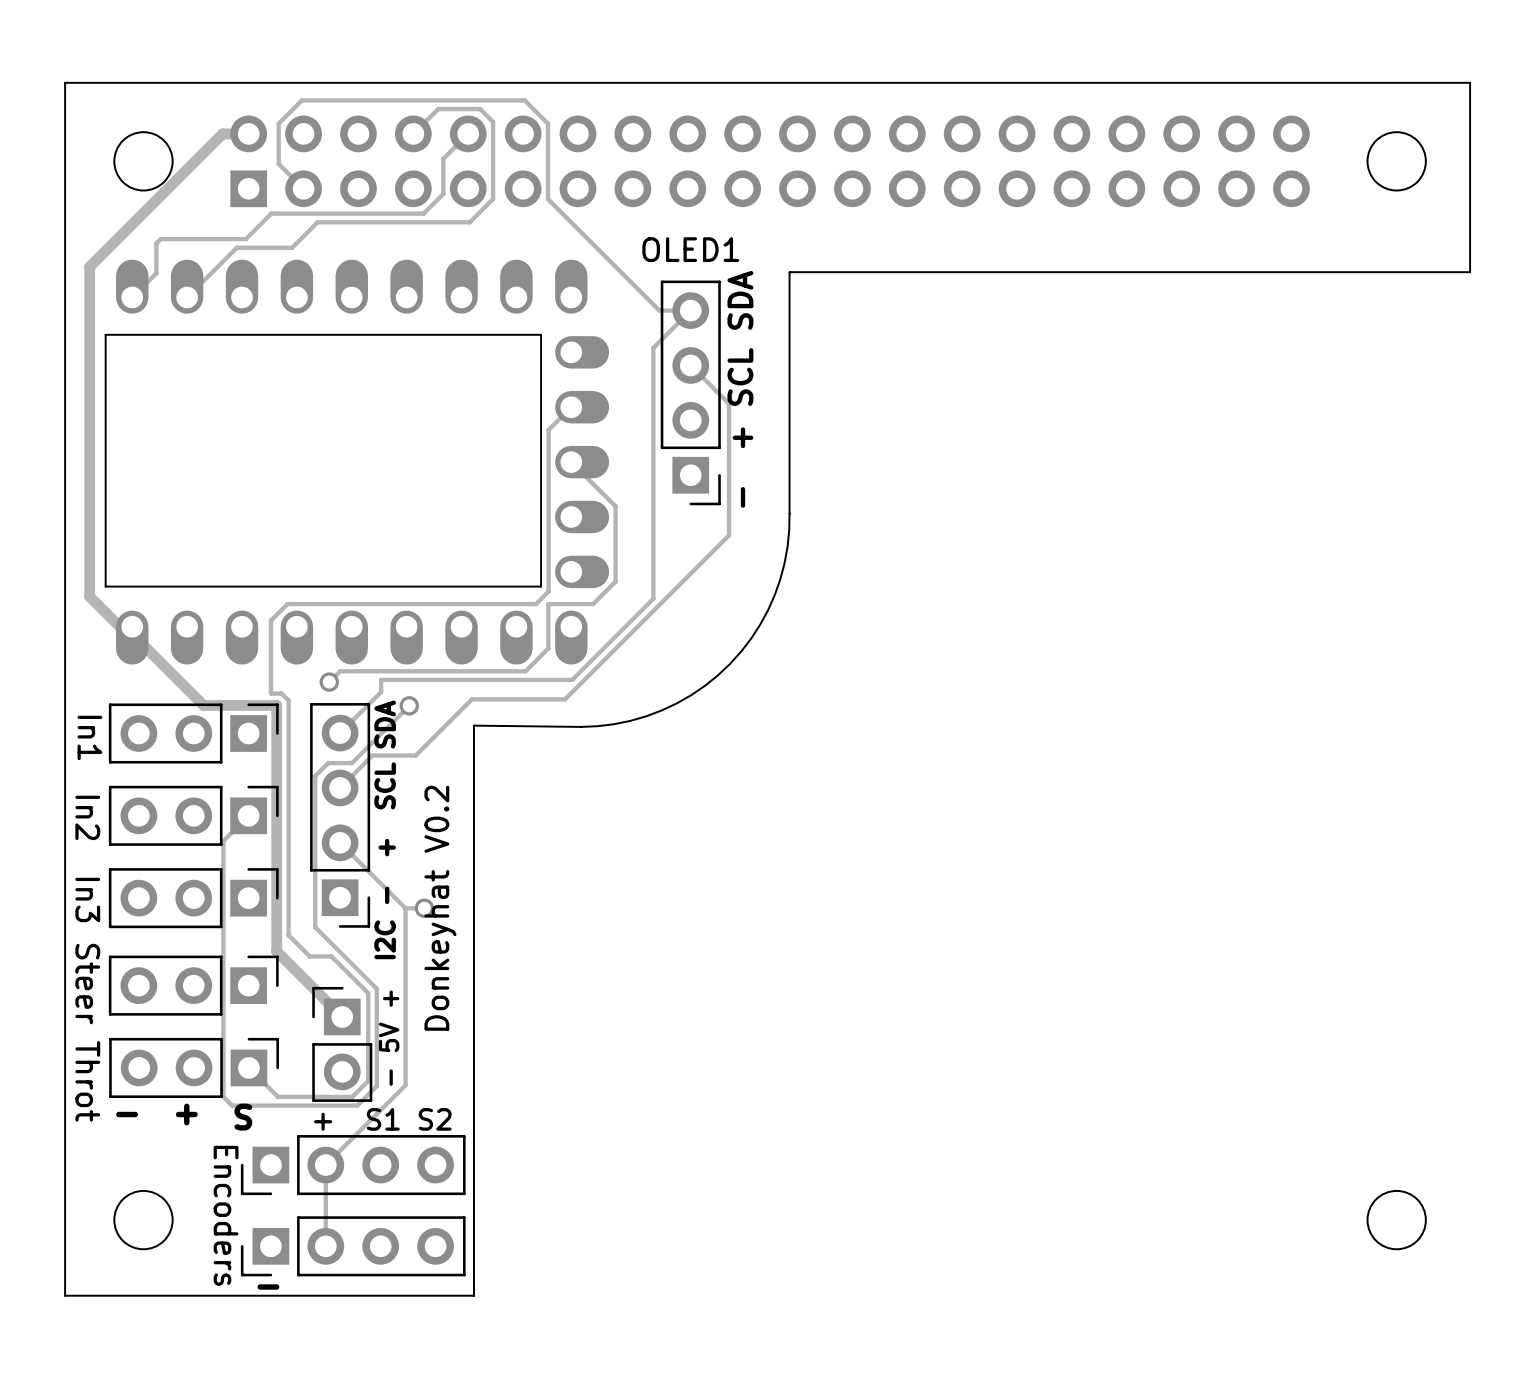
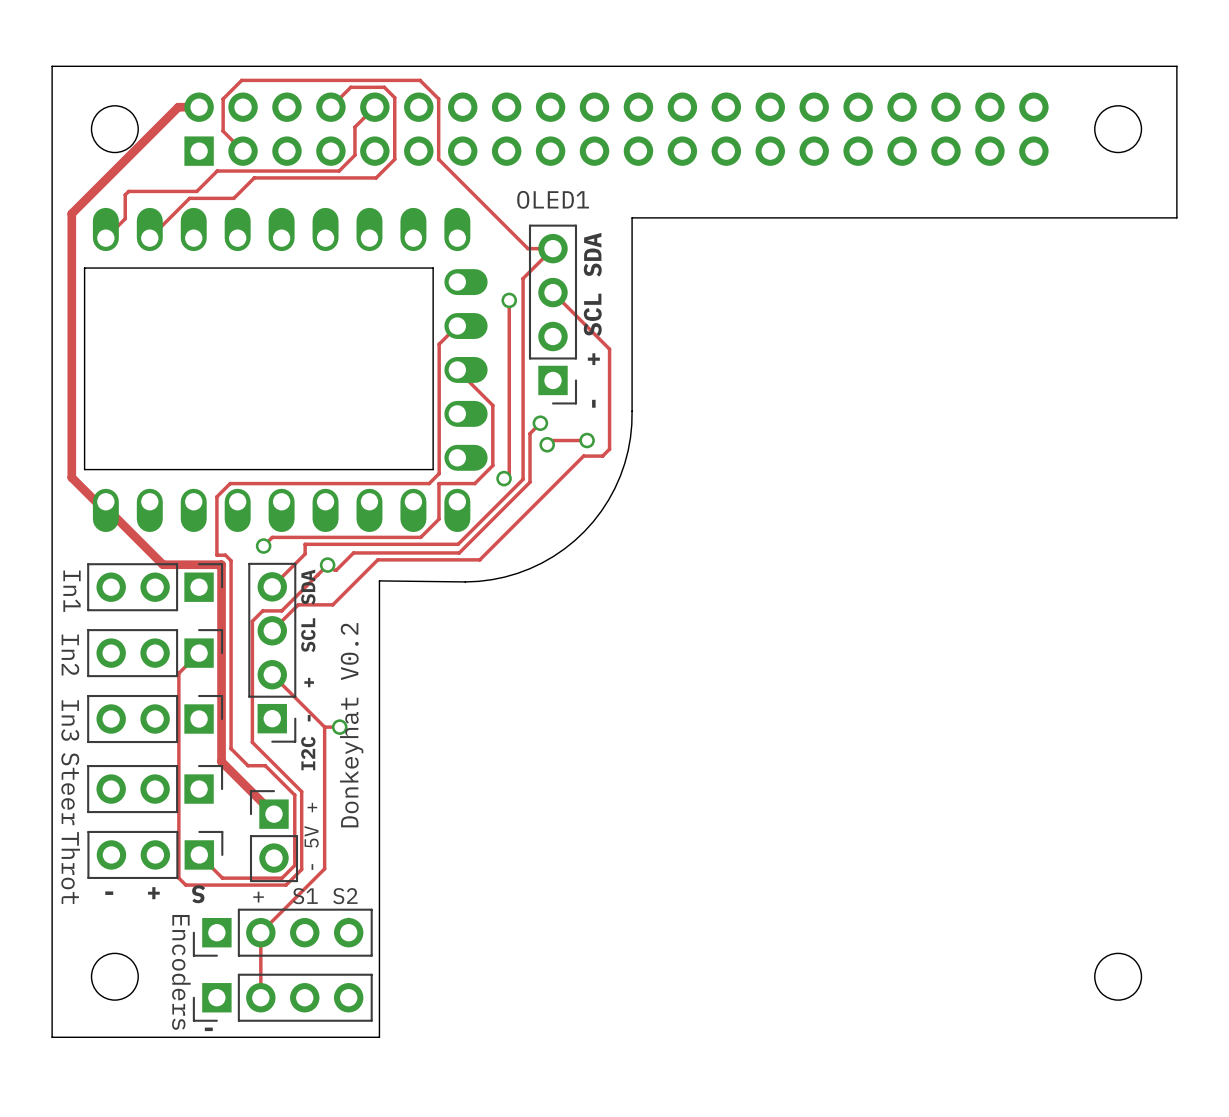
track: none -> (509, 300) (509, 475) (504, 480) (504, 478) (505, 478)
via: none -> (509, 300)
track: (729, 403) (729, 535) (662, 602) -> (540, 423) (530, 433) (530, 482)
track: none -> (583, 323) (609, 349) (609, 449) (602, 456) (583, 456) (479, 559) (452, 559)
via: none -> (540, 423)
track: none -> (587, 440) (551, 440) (547, 444)
via: none -> (587, 440)
via: none -> (547, 444)
via: none -> (504, 478)
track: (573, 690) (565, 699) -> (459, 552) (353, 552) (334, 570)

